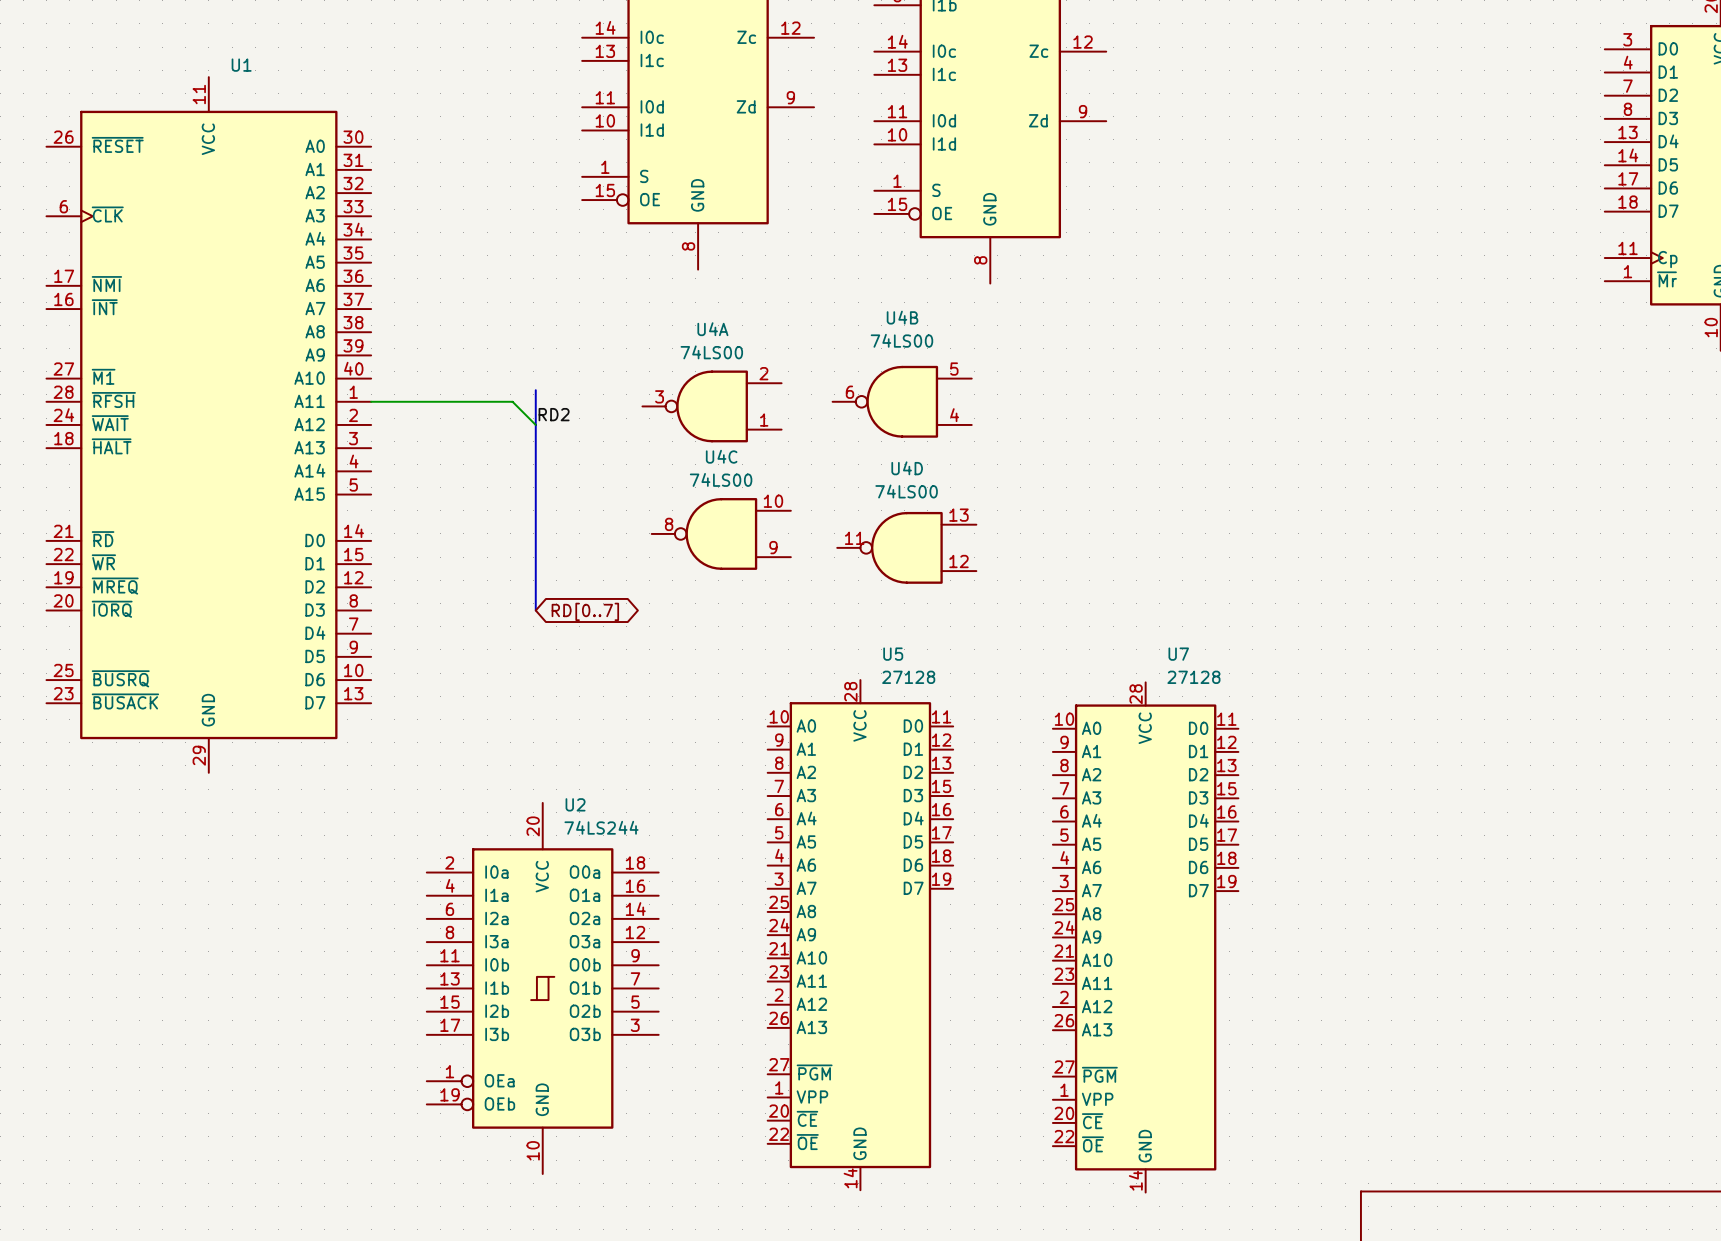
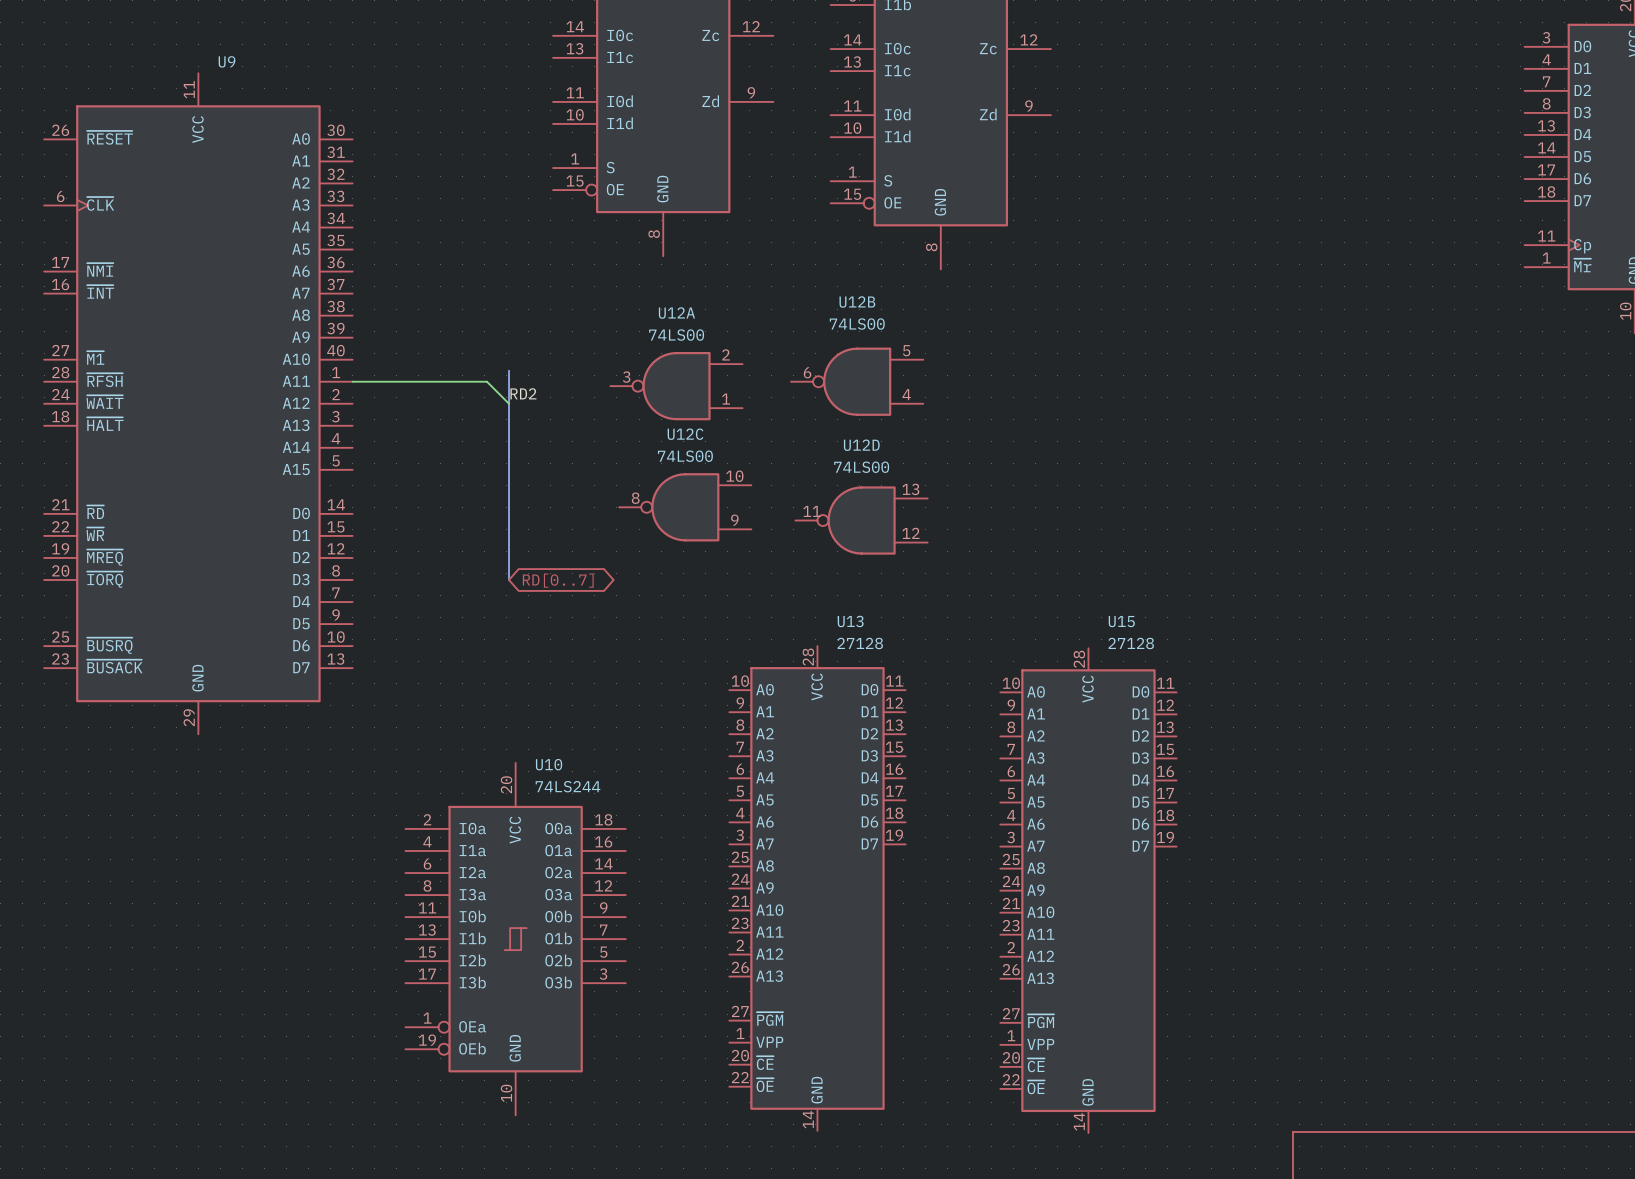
U1 name: U1 (241, 65) -> U9 (227, 61)
U4B name: U4B (902, 317) -> U12B (857, 302)
U4A name: U4A (712, 329) -> U12A (676, 313)
U4C name: U4C (721, 456) -> U12C (685, 434)
U4D name: U4D (907, 468) -> U12D (861, 445)
U5 name: U5 (893, 654) -> U13 (850, 621)
U7 name: U7 (1178, 654) -> U15 (1121, 621)
U2 name: U2 (575, 804) -> U10 (549, 764)

